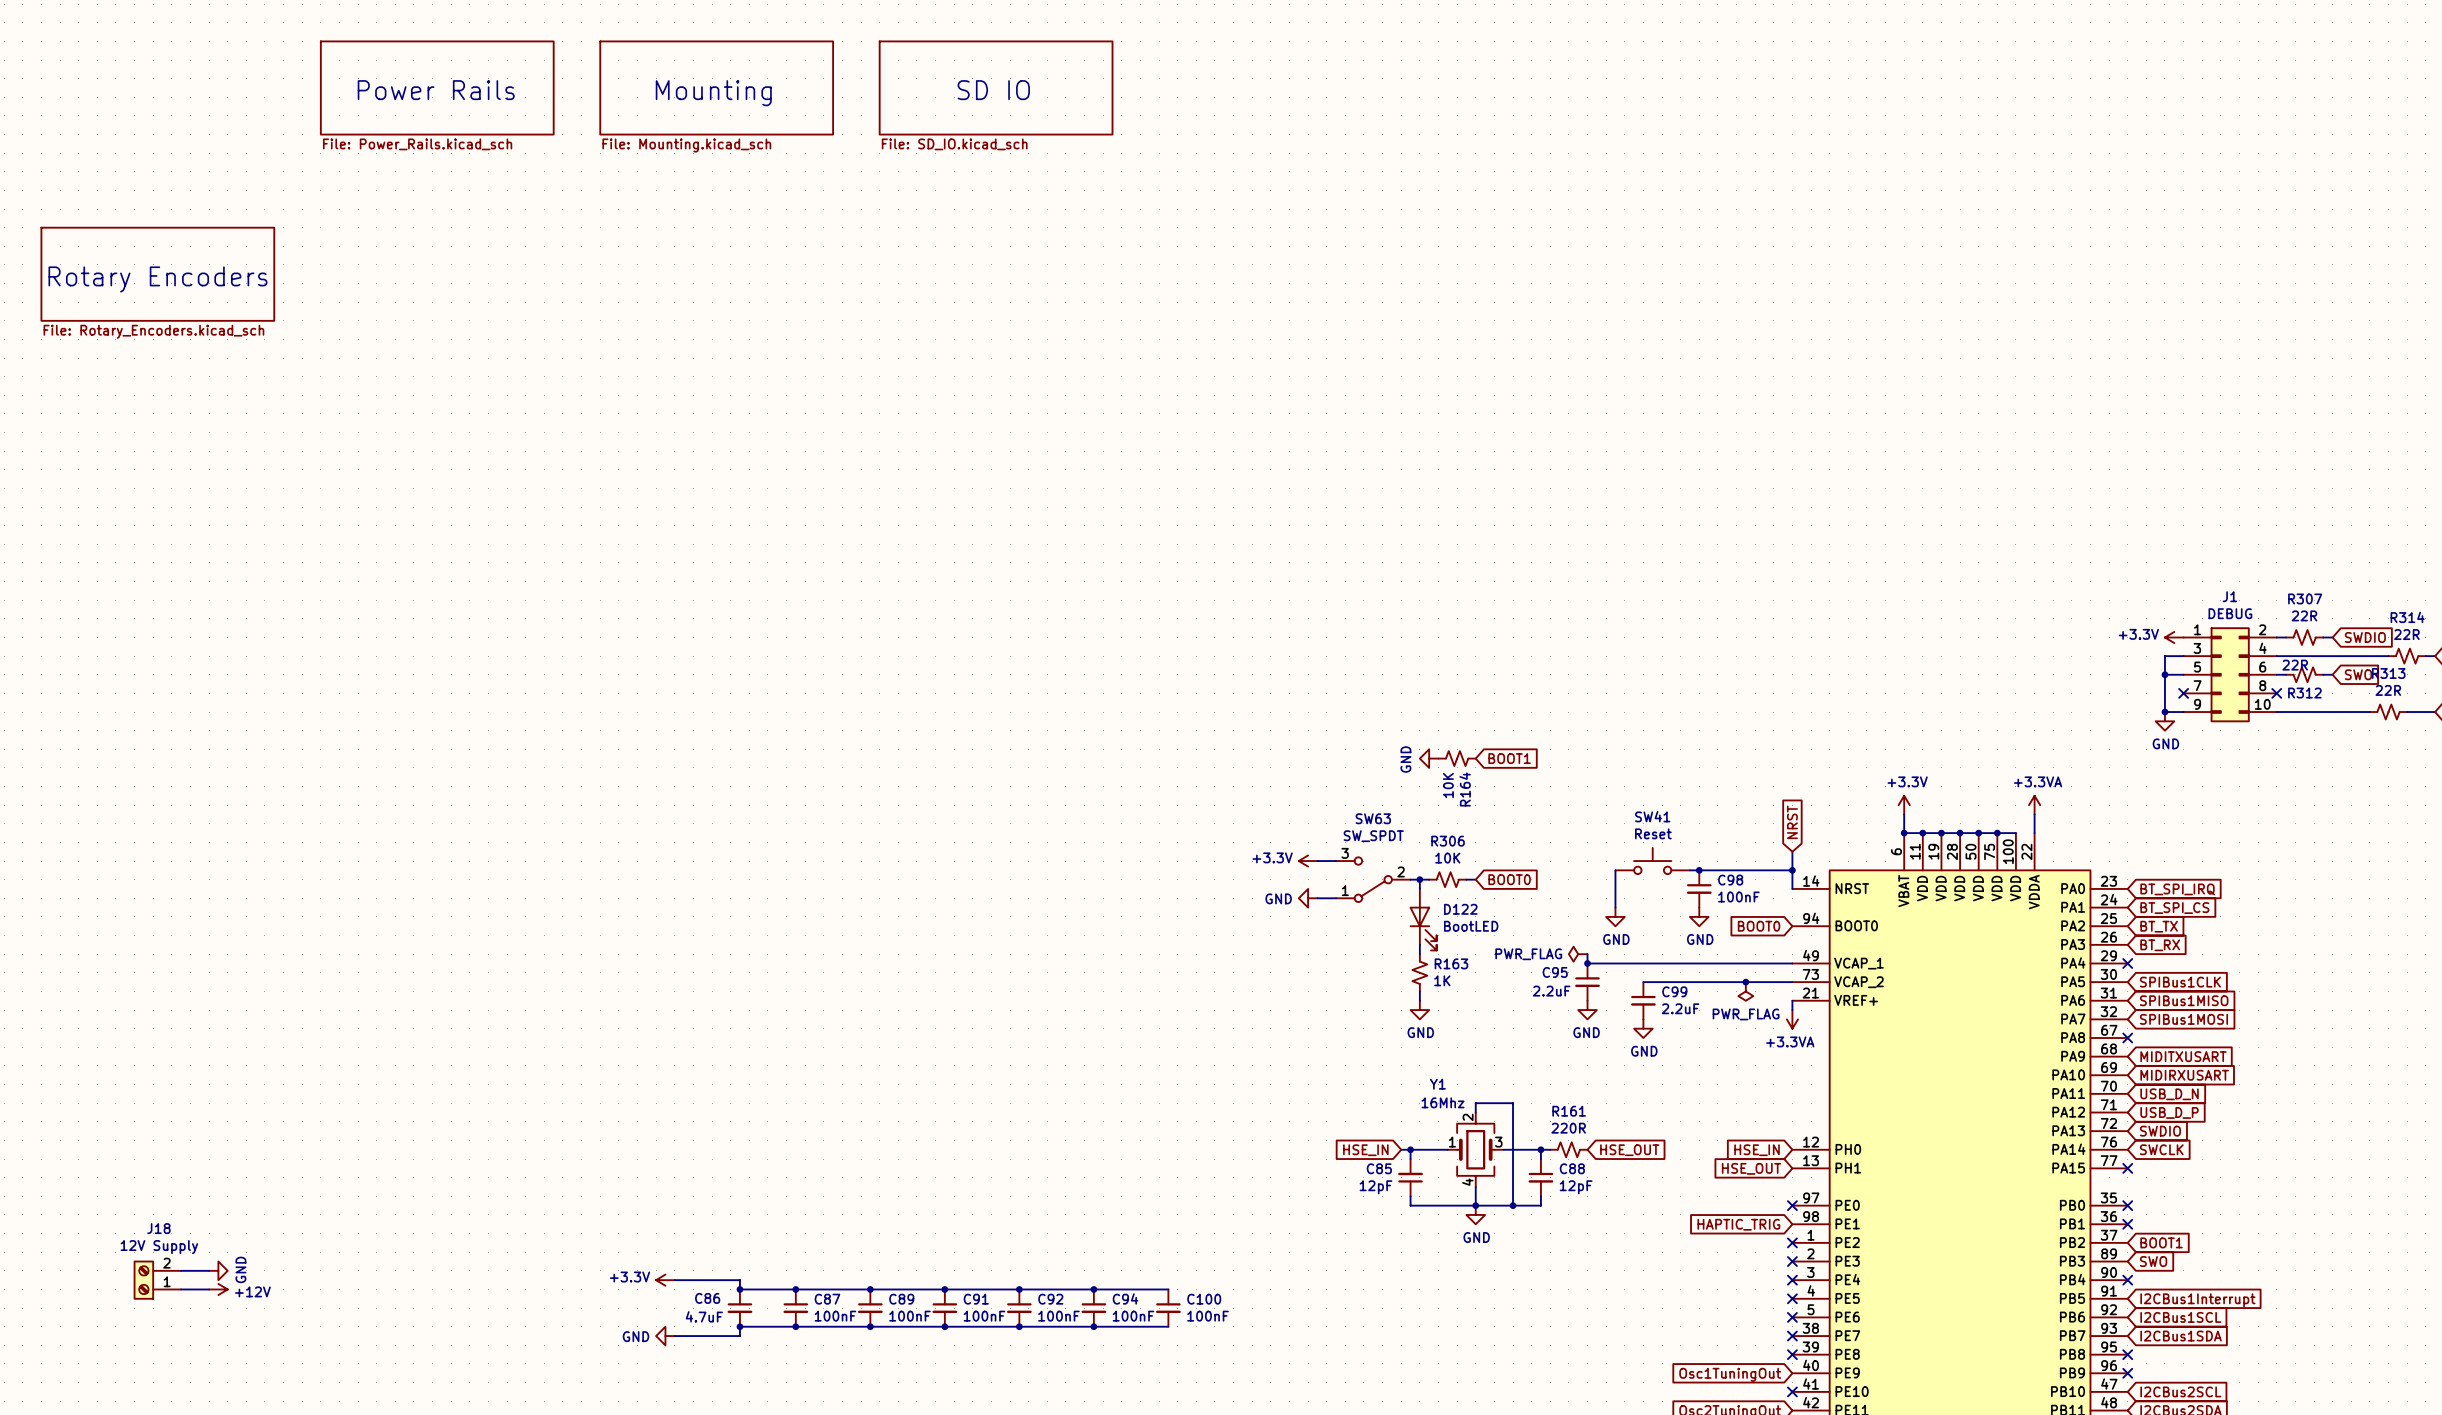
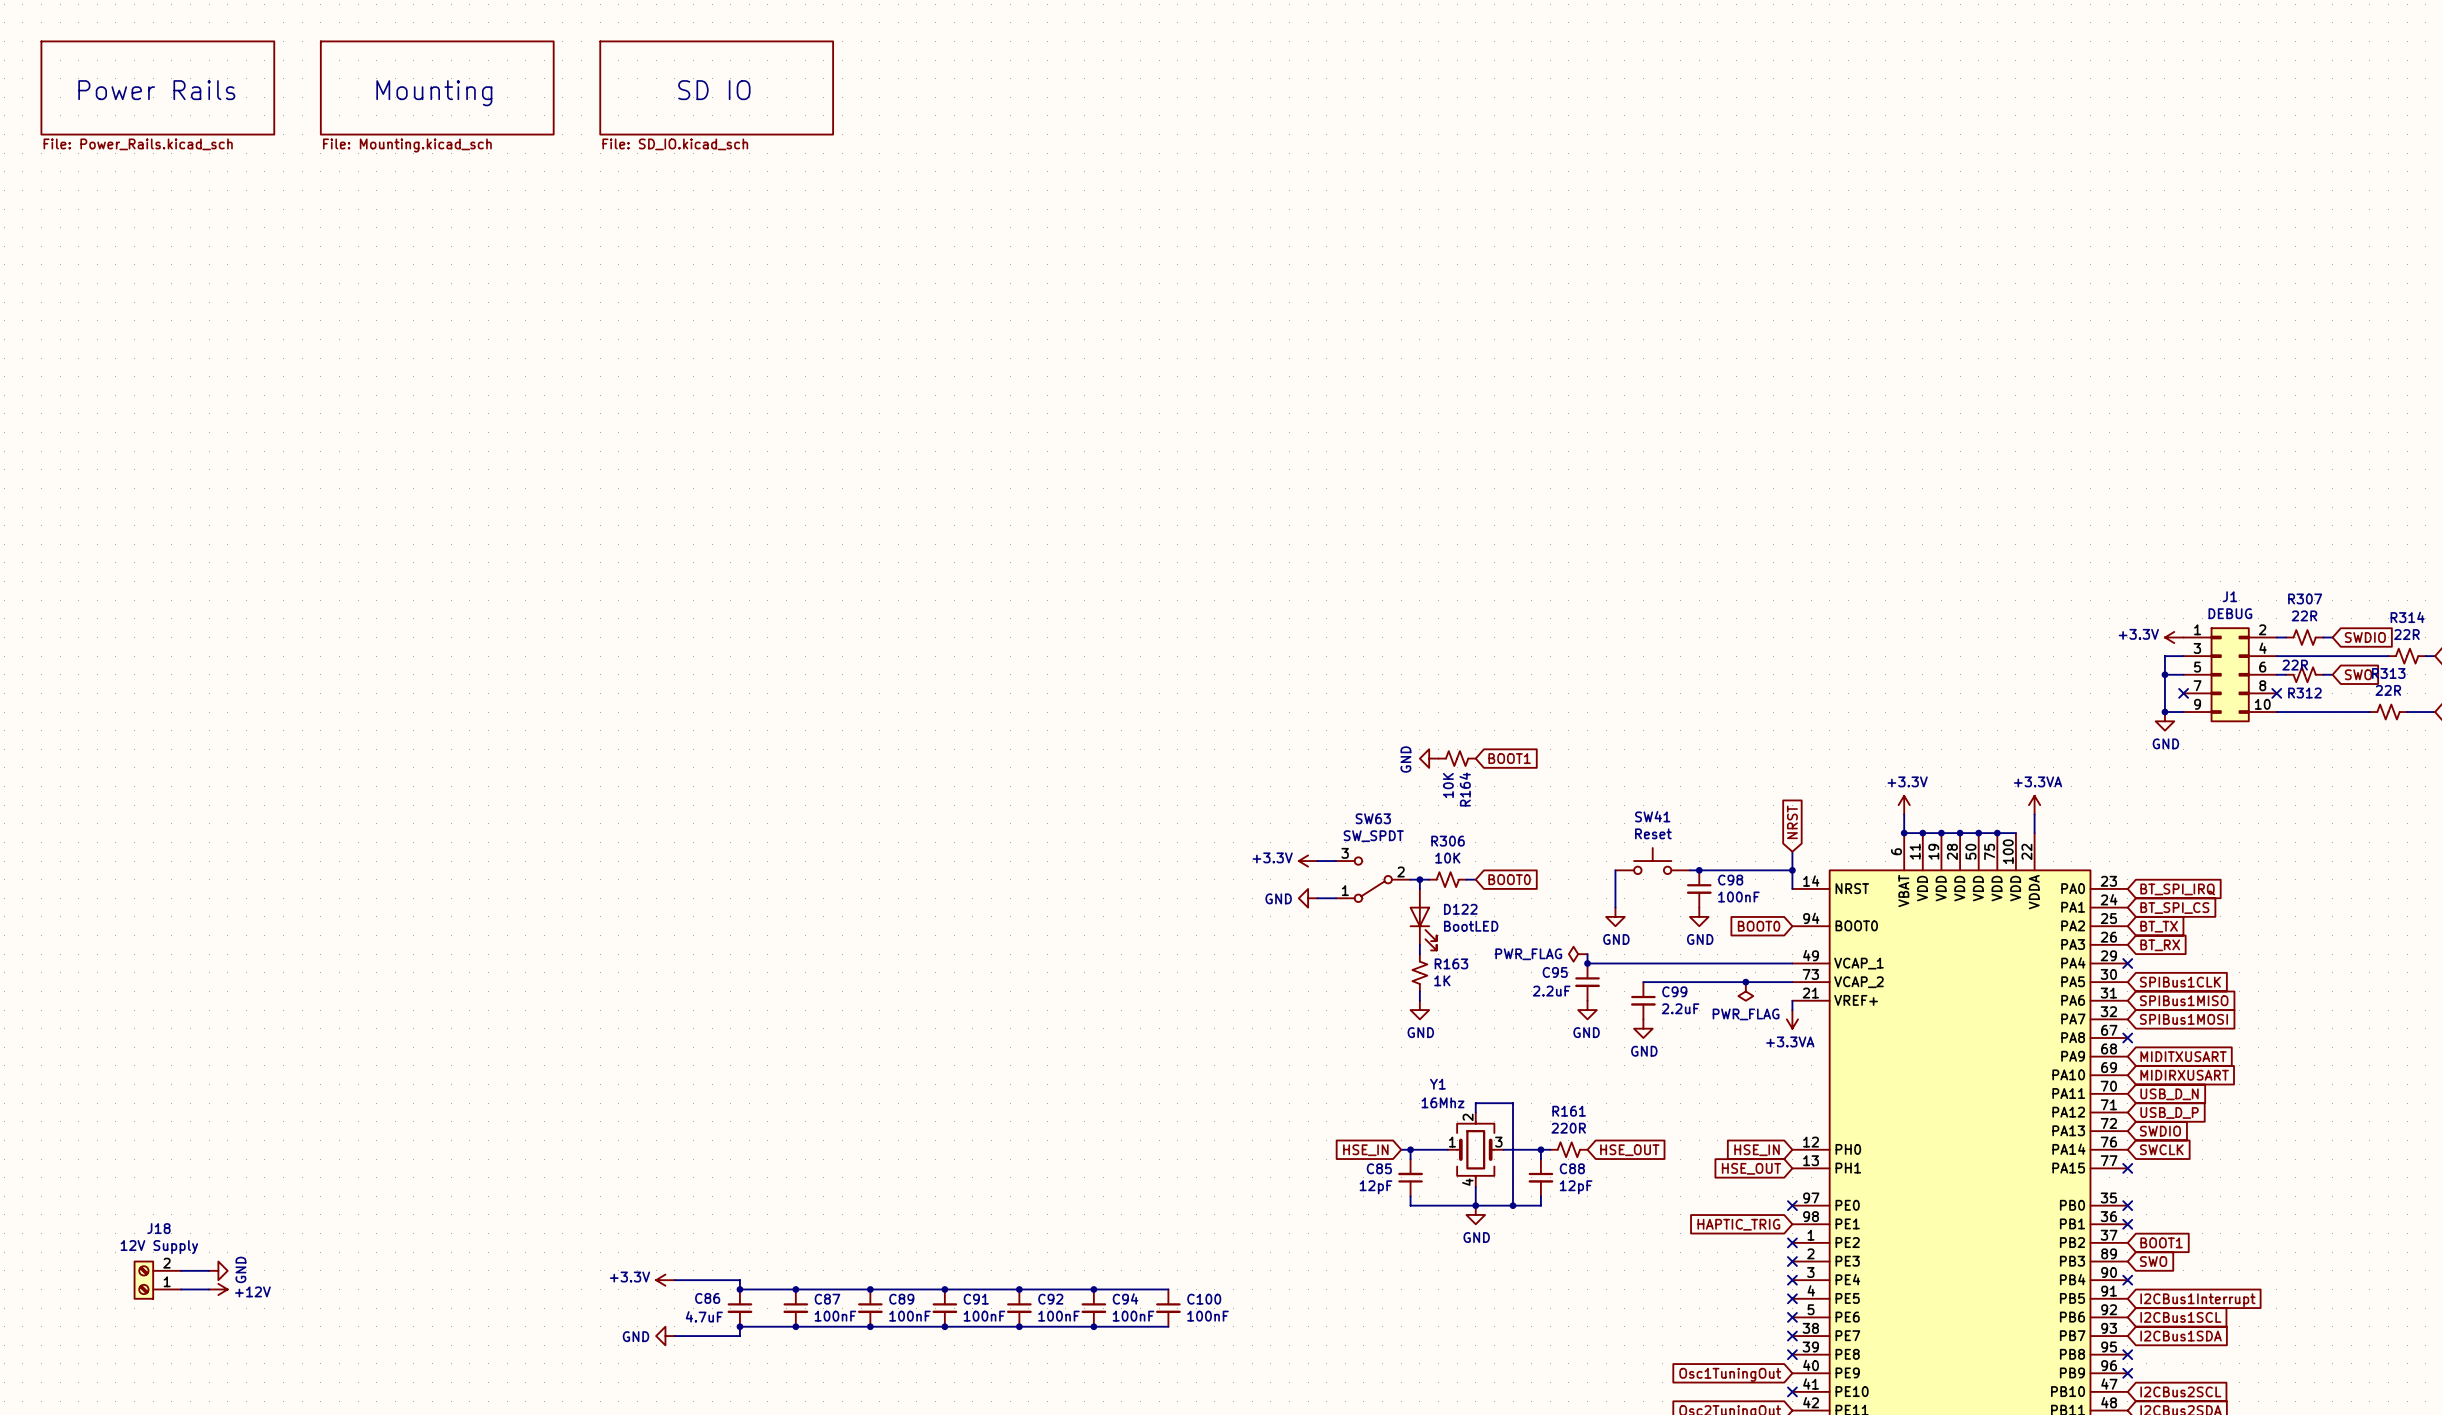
sheet Power Rails: none -> File: Power_Rails.kicad_sch (157, 87)
sheet SD IO: File: SD_IO.kicad_sch (996, 87) -> none
sheet Power Rails name: Power Rails (436, 90) -> Mounting (434, 93)
sheet Mounting name: Mounting (713, 93) -> SD IO (714, 90)
sheet Power Rails value: File: Power_Rails.kicad_sch (417, 144) -> File: Mounting.kicad_sch (407, 145)
sheet Mounting value: File: Mounting.kicad_sch (686, 145) -> File: SD_IO.kicad_sch (675, 144)
sheet Rotary Encoders: File: Rotary_Encoders.kicad_sch (157, 274) -> none

